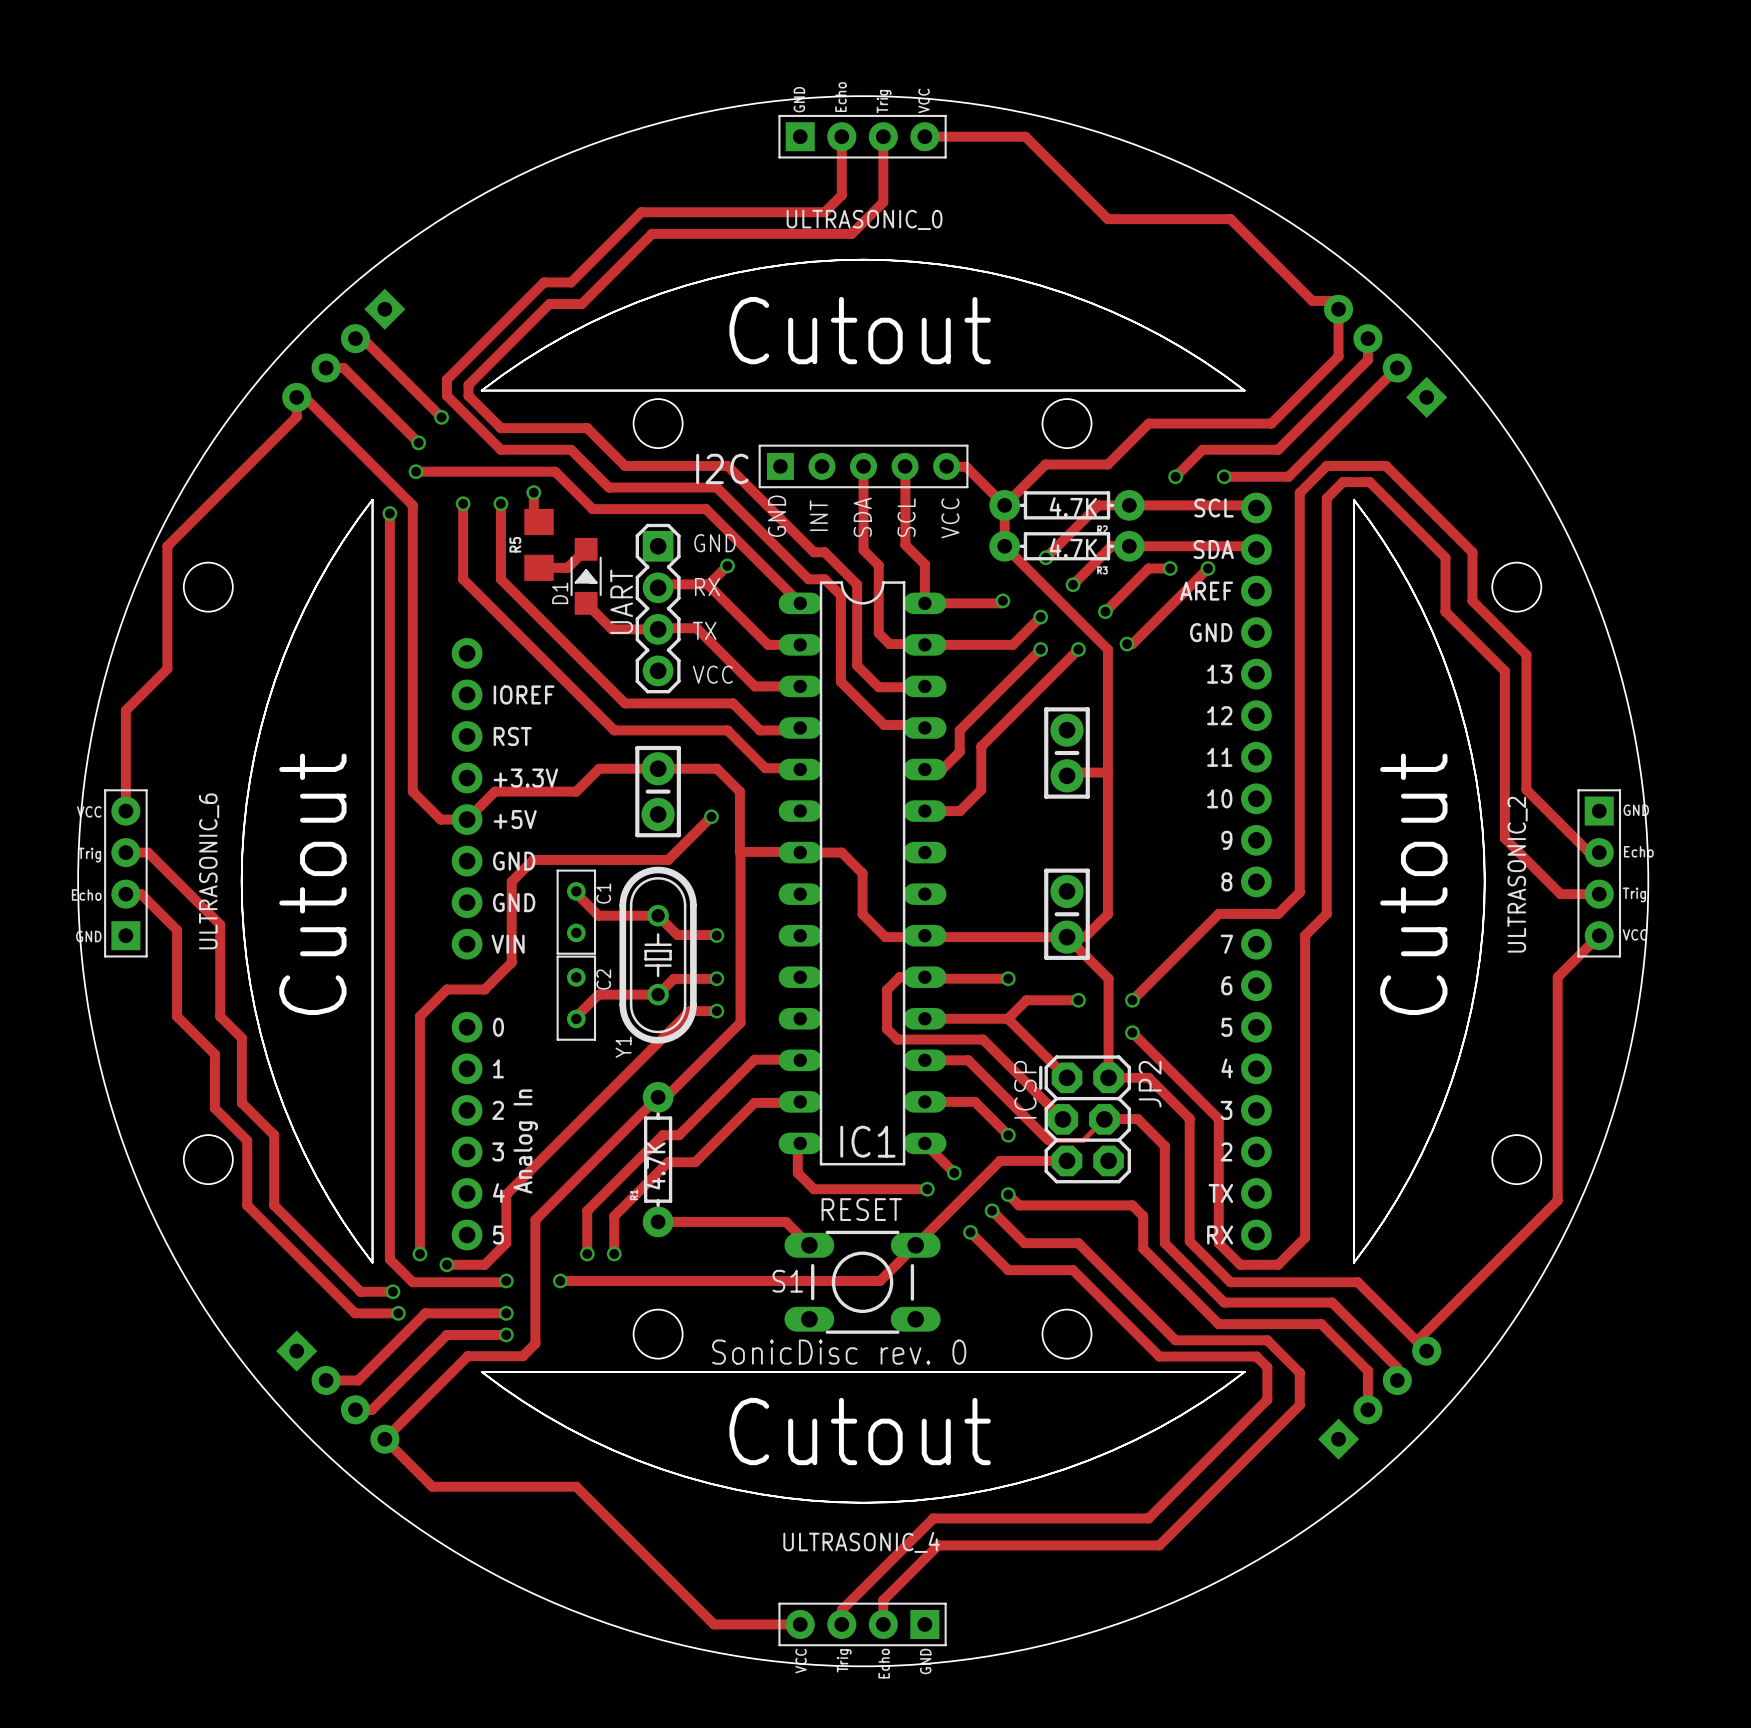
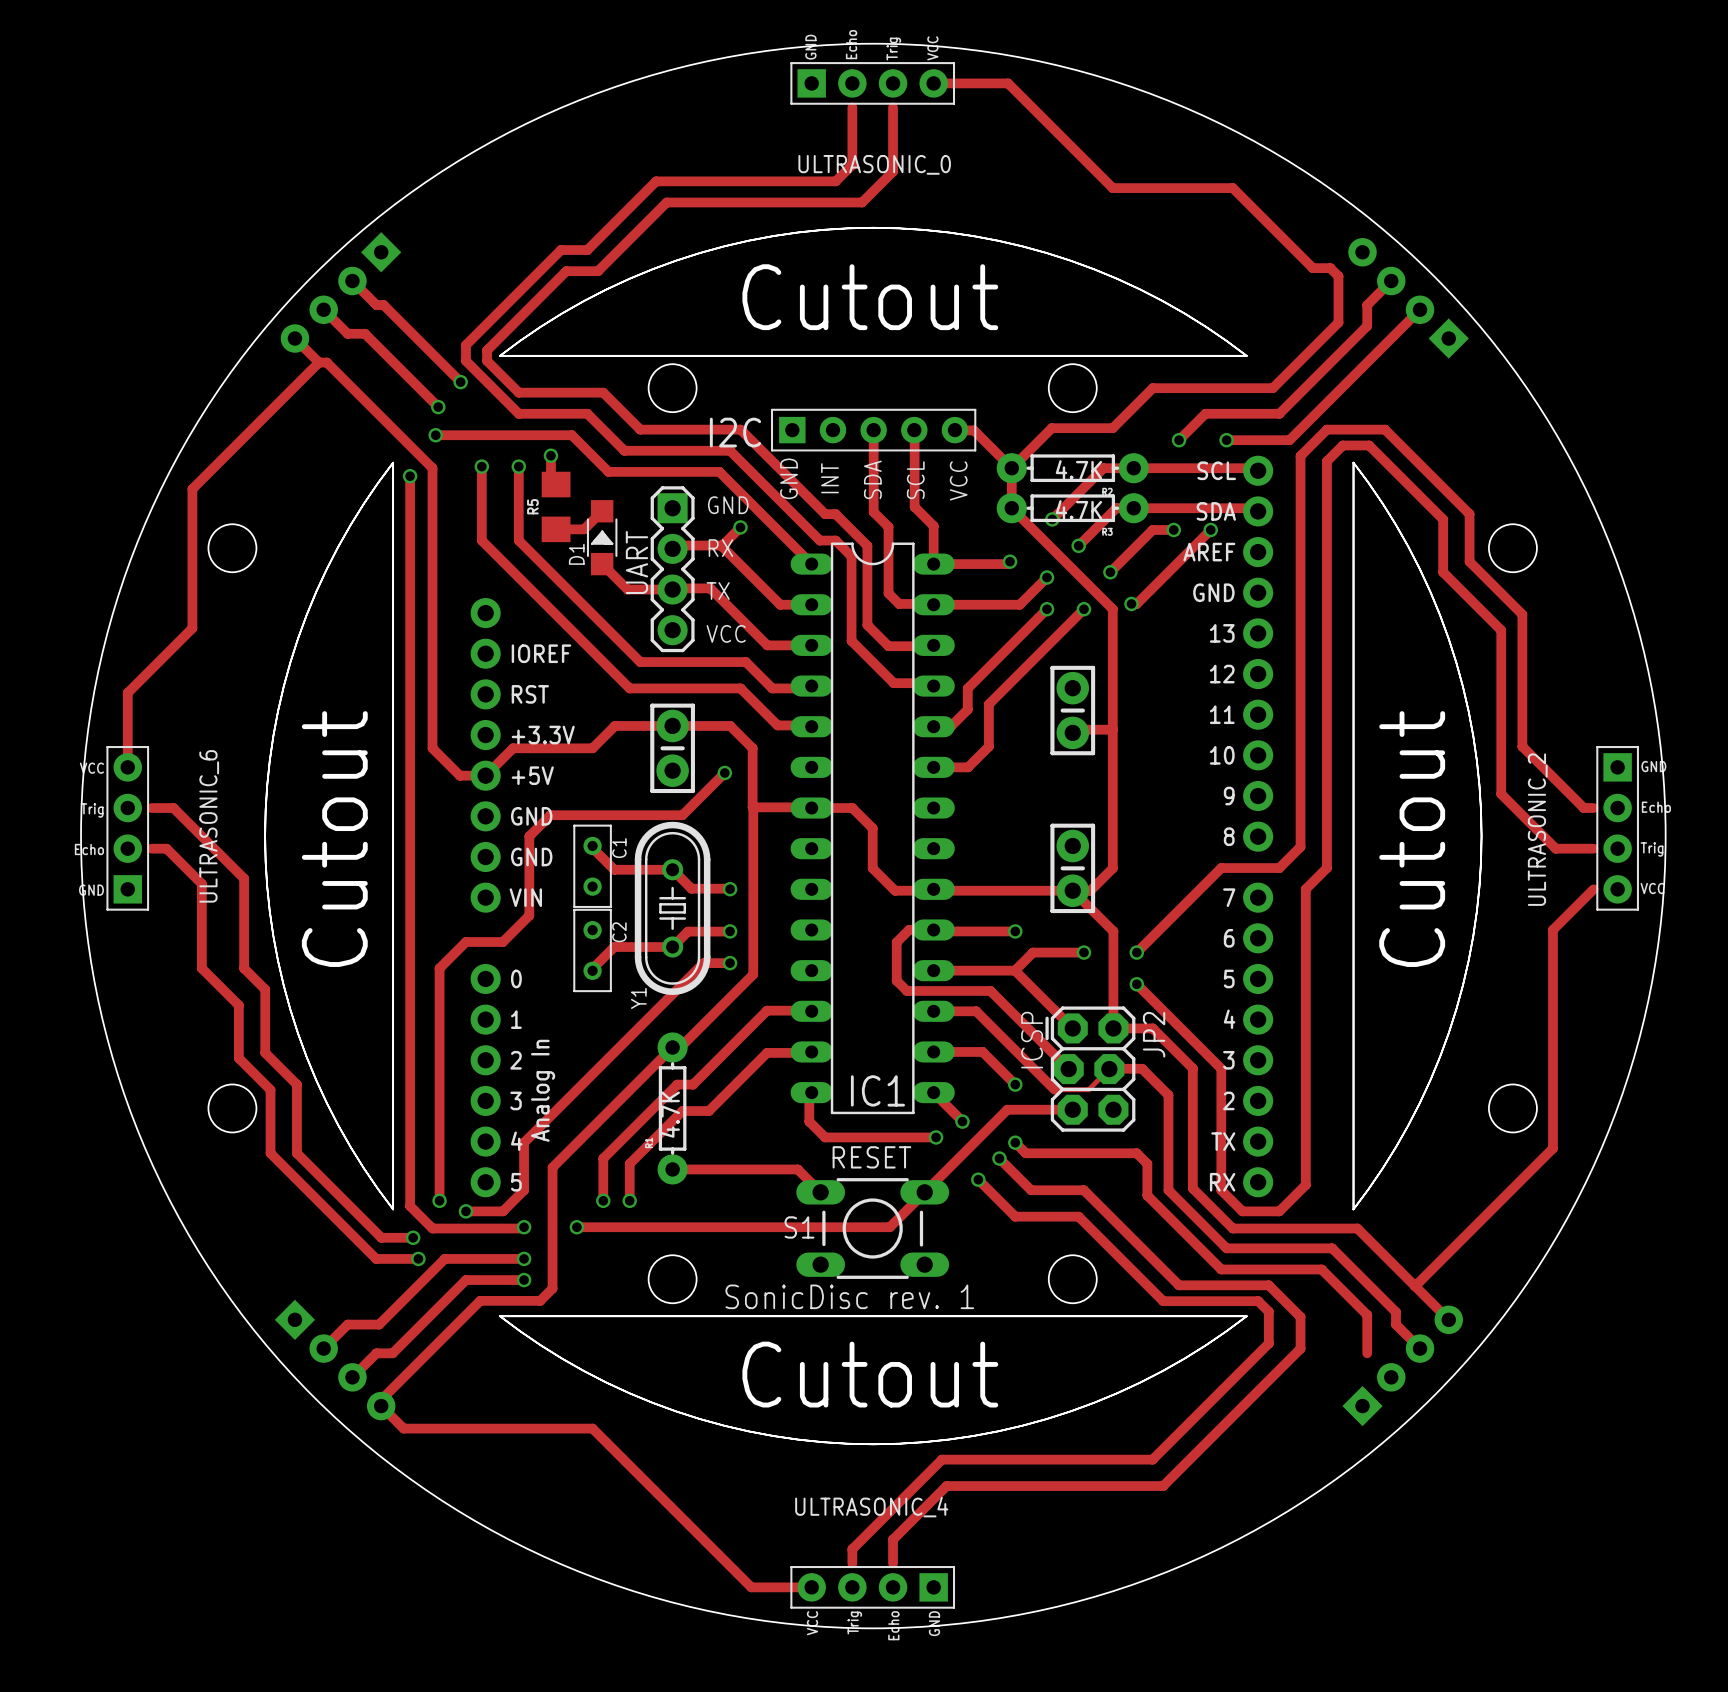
round board edge size: [78, 96, 1649, 1667] -> [81, 43, 1666, 1629]
ULTRASONIC_0 position: (862, 136) -> (872, 83)
track: (924, 136) (1025, 136) -> (933, 83) (1008, 83) (1032, 107)
track: none -> (352, 281) (376, 305)
track: none -> (1391, 281) (1367, 305)
track: none -> (323, 309) (347, 333)
track: none -> (1420, 309) (1396, 333)
part position: (343, 350) -> (341, 292)
part position: (1385, 356) -> (1408, 298)
track: (296, 397) (296, 416) (167, 546) -> (294, 338) (318, 362) (192, 489) (192, 508)
track: (125, 710) (125, 811) -> (151, 668) (127, 692) (127, 767)
ULTRASONIC_6 position: (125, 873) -> (127, 828)
ULTRASONIC_2 position: (1599, 873) -> (1617, 828)
track: none -> (1424, 1295) (1448, 1319)
text: SonicDisc rev. 0 (839, 1352) -> SonicDisc rev. 1 (849, 1296)
track: (467, 1356) (384, 1439) (432, 1486) -> (486, 1300) (480, 1300) (381, 1399) (381, 1406) (403, 1428) (451, 1428)
track: none -> (347, 1324) (323, 1348)
track: none -> (1396, 1324) (1420, 1348)
part position: (337, 1392) -> (335, 1360)
part position: (1379, 1398) -> (1402, 1365)
track: none -> (376, 1353) (352, 1377)
track: (714, 1624) (800, 1624) -> (727, 1563) (751, 1587) (811, 1587)
ULTRASONIC_4 position: (862, 1624) -> (872, 1587)

